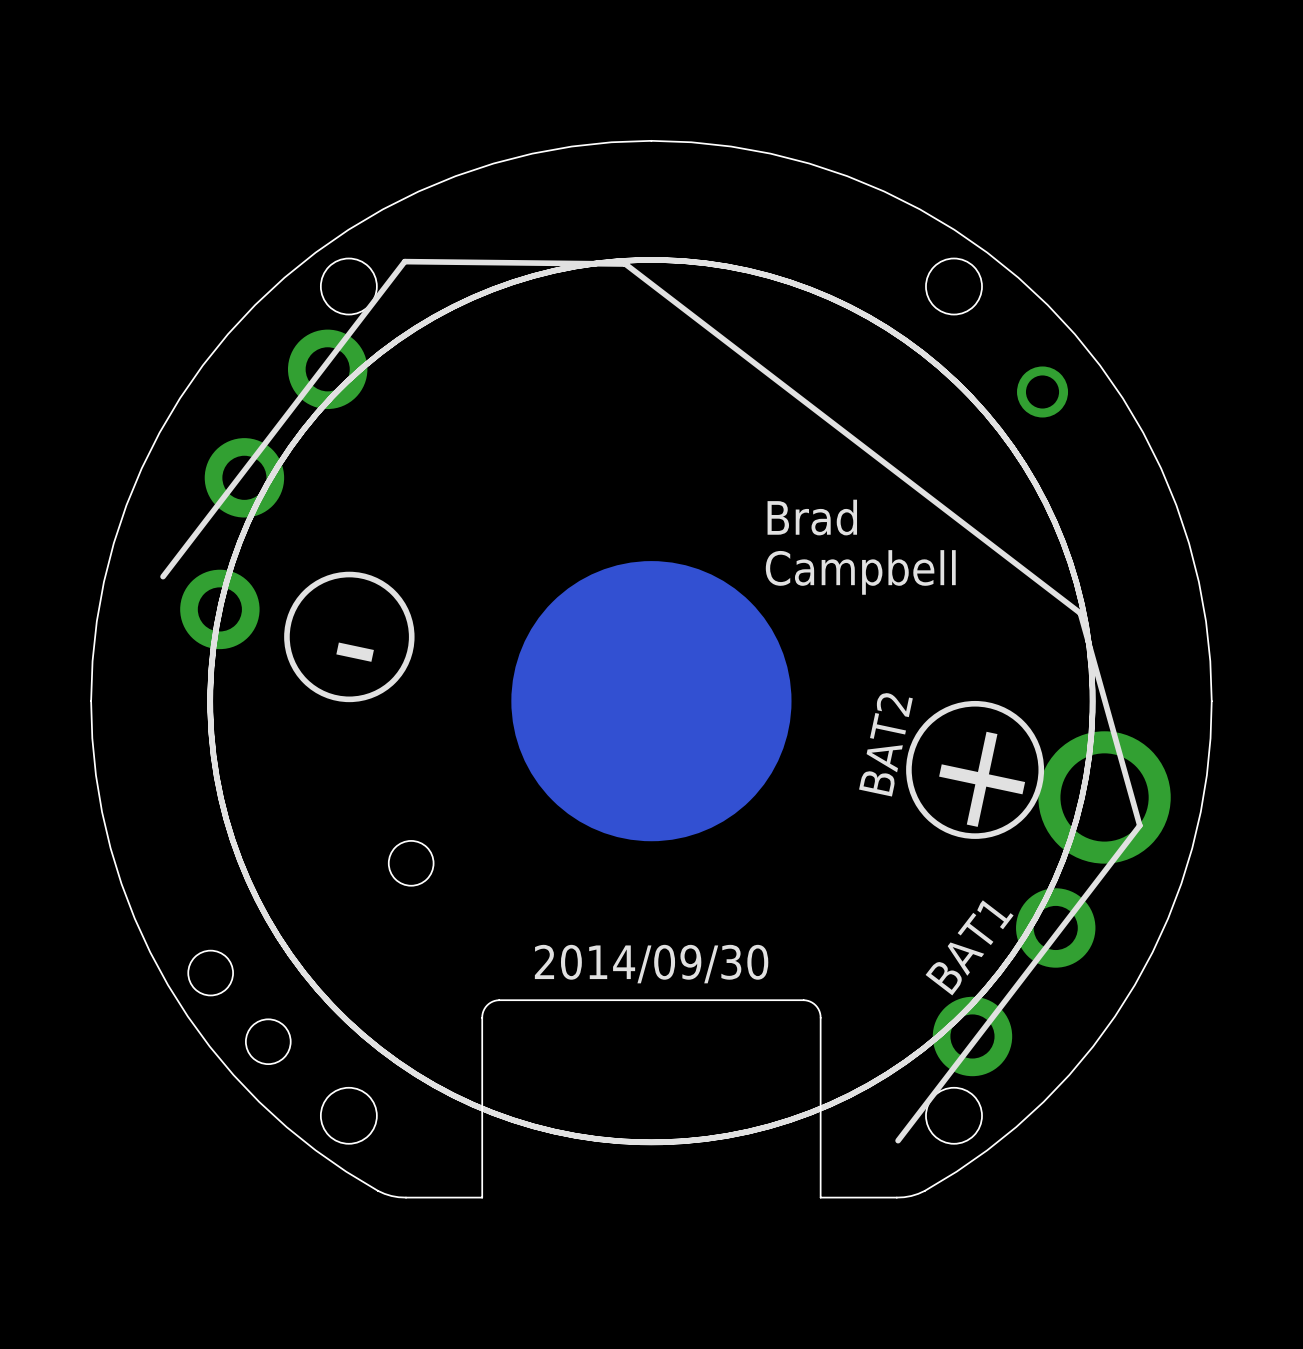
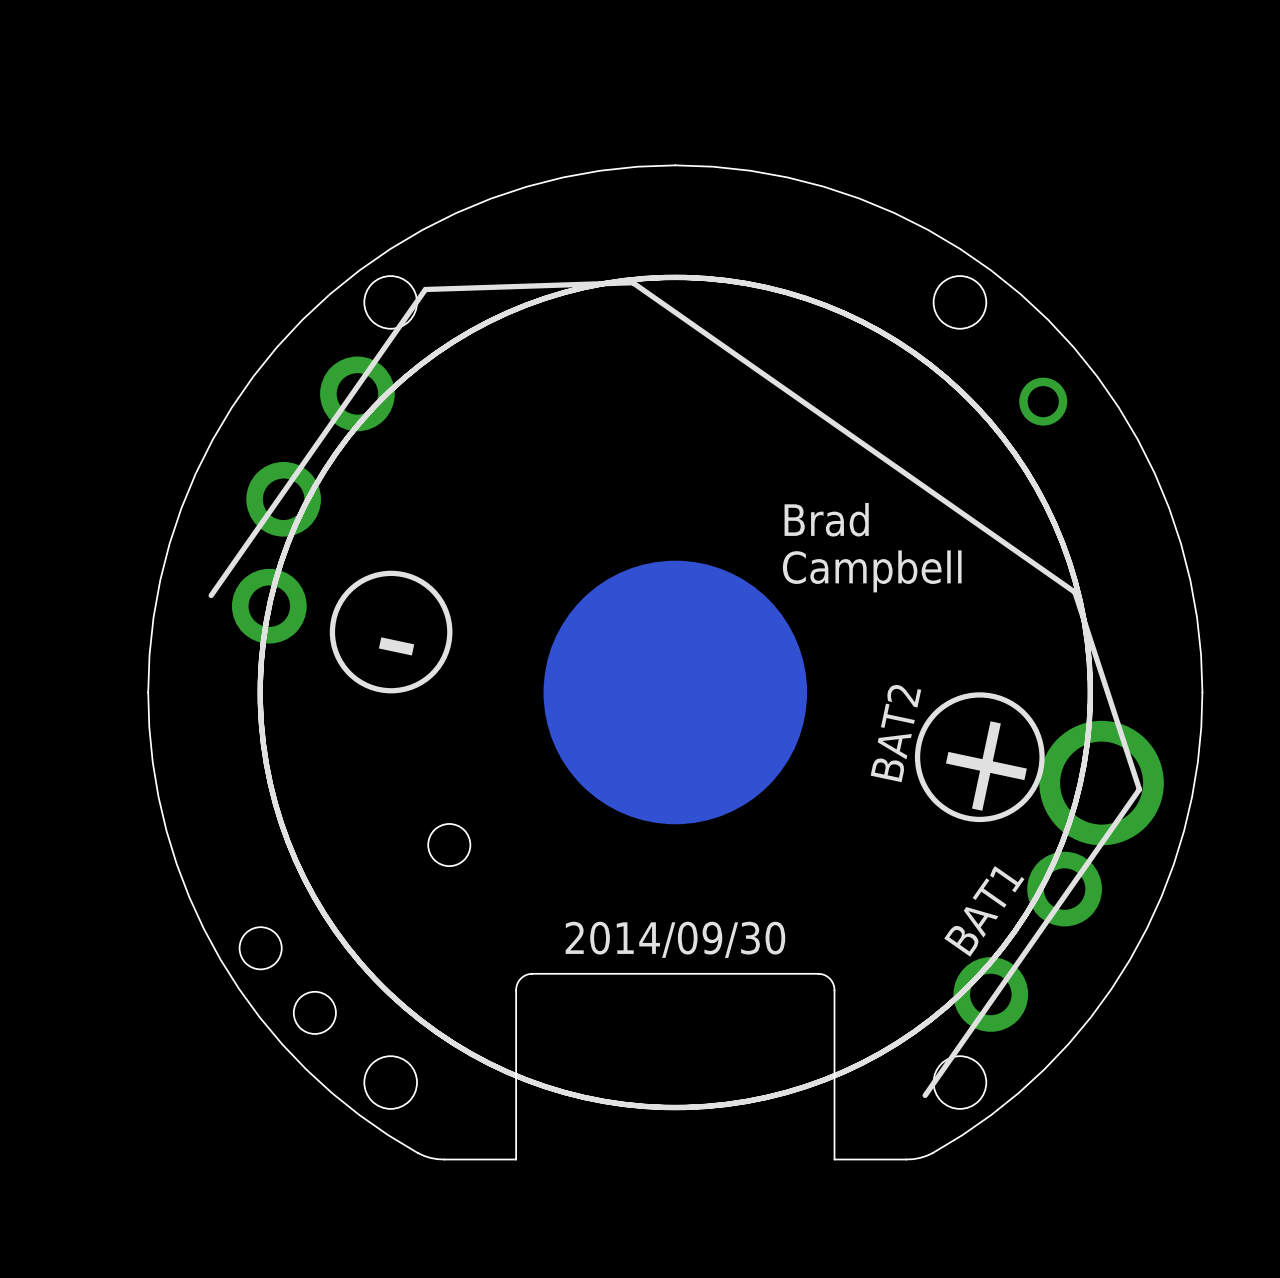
BAT1 rotation: 0° (651, 701) -> 2.5° counterclockwise (675, 692)

